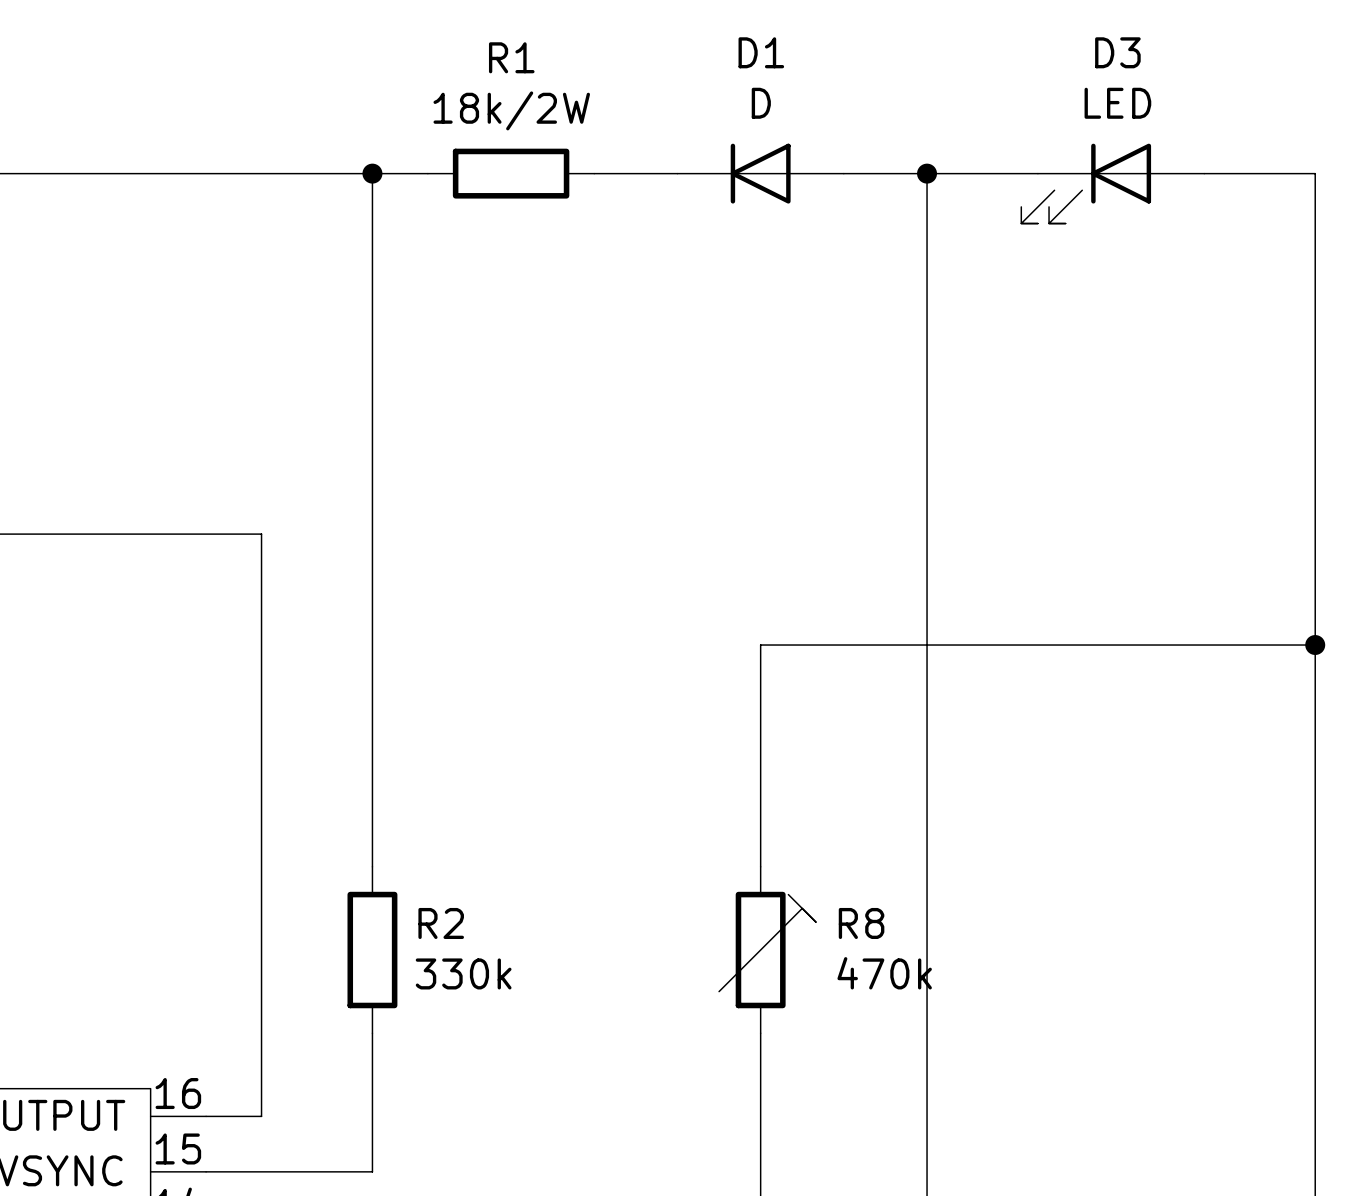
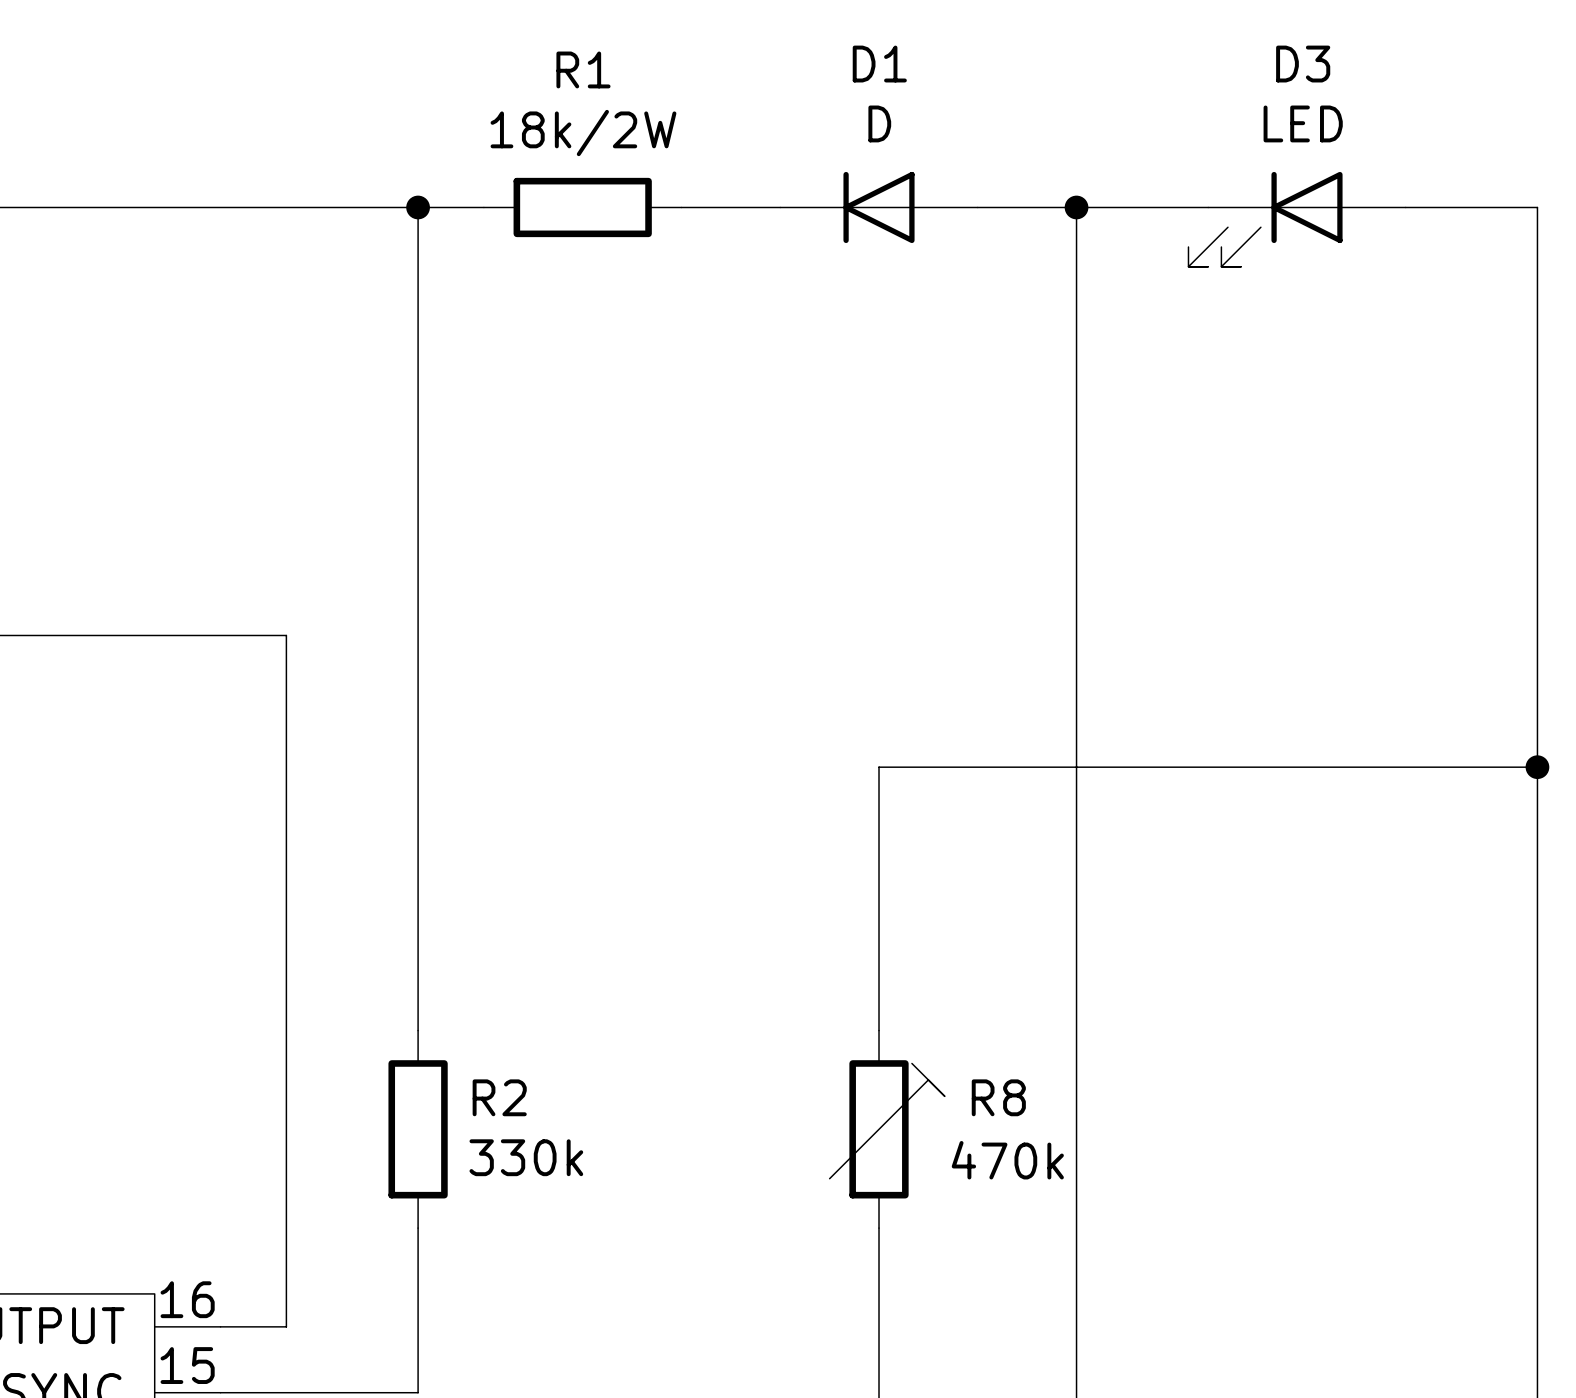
R8 value position: 470k (884, 973) -> 470k (1007, 1160)

